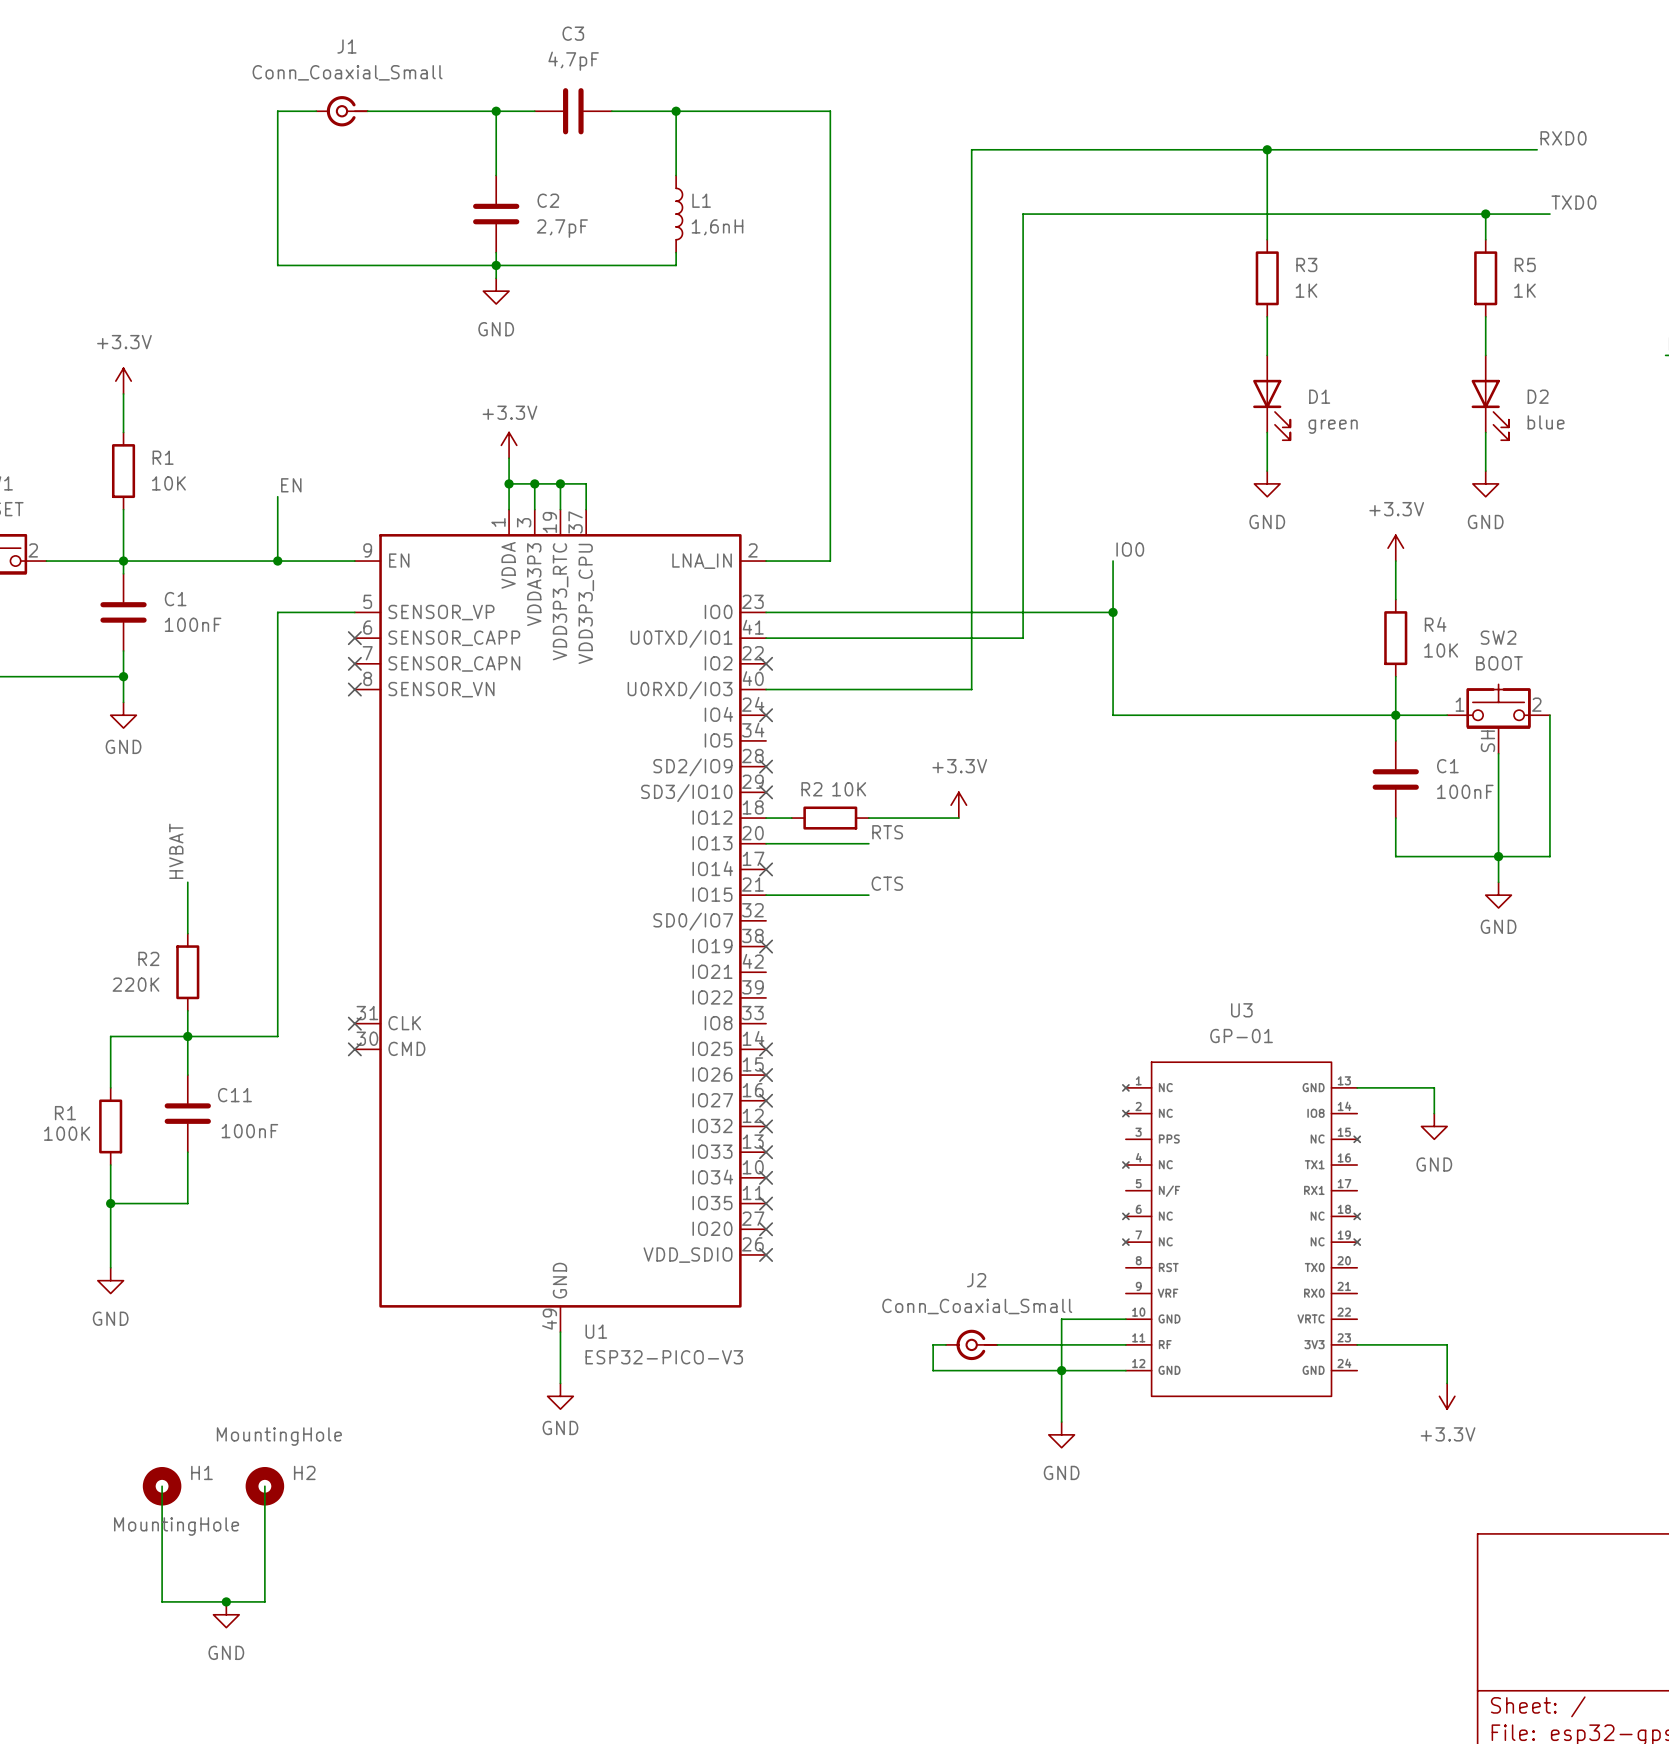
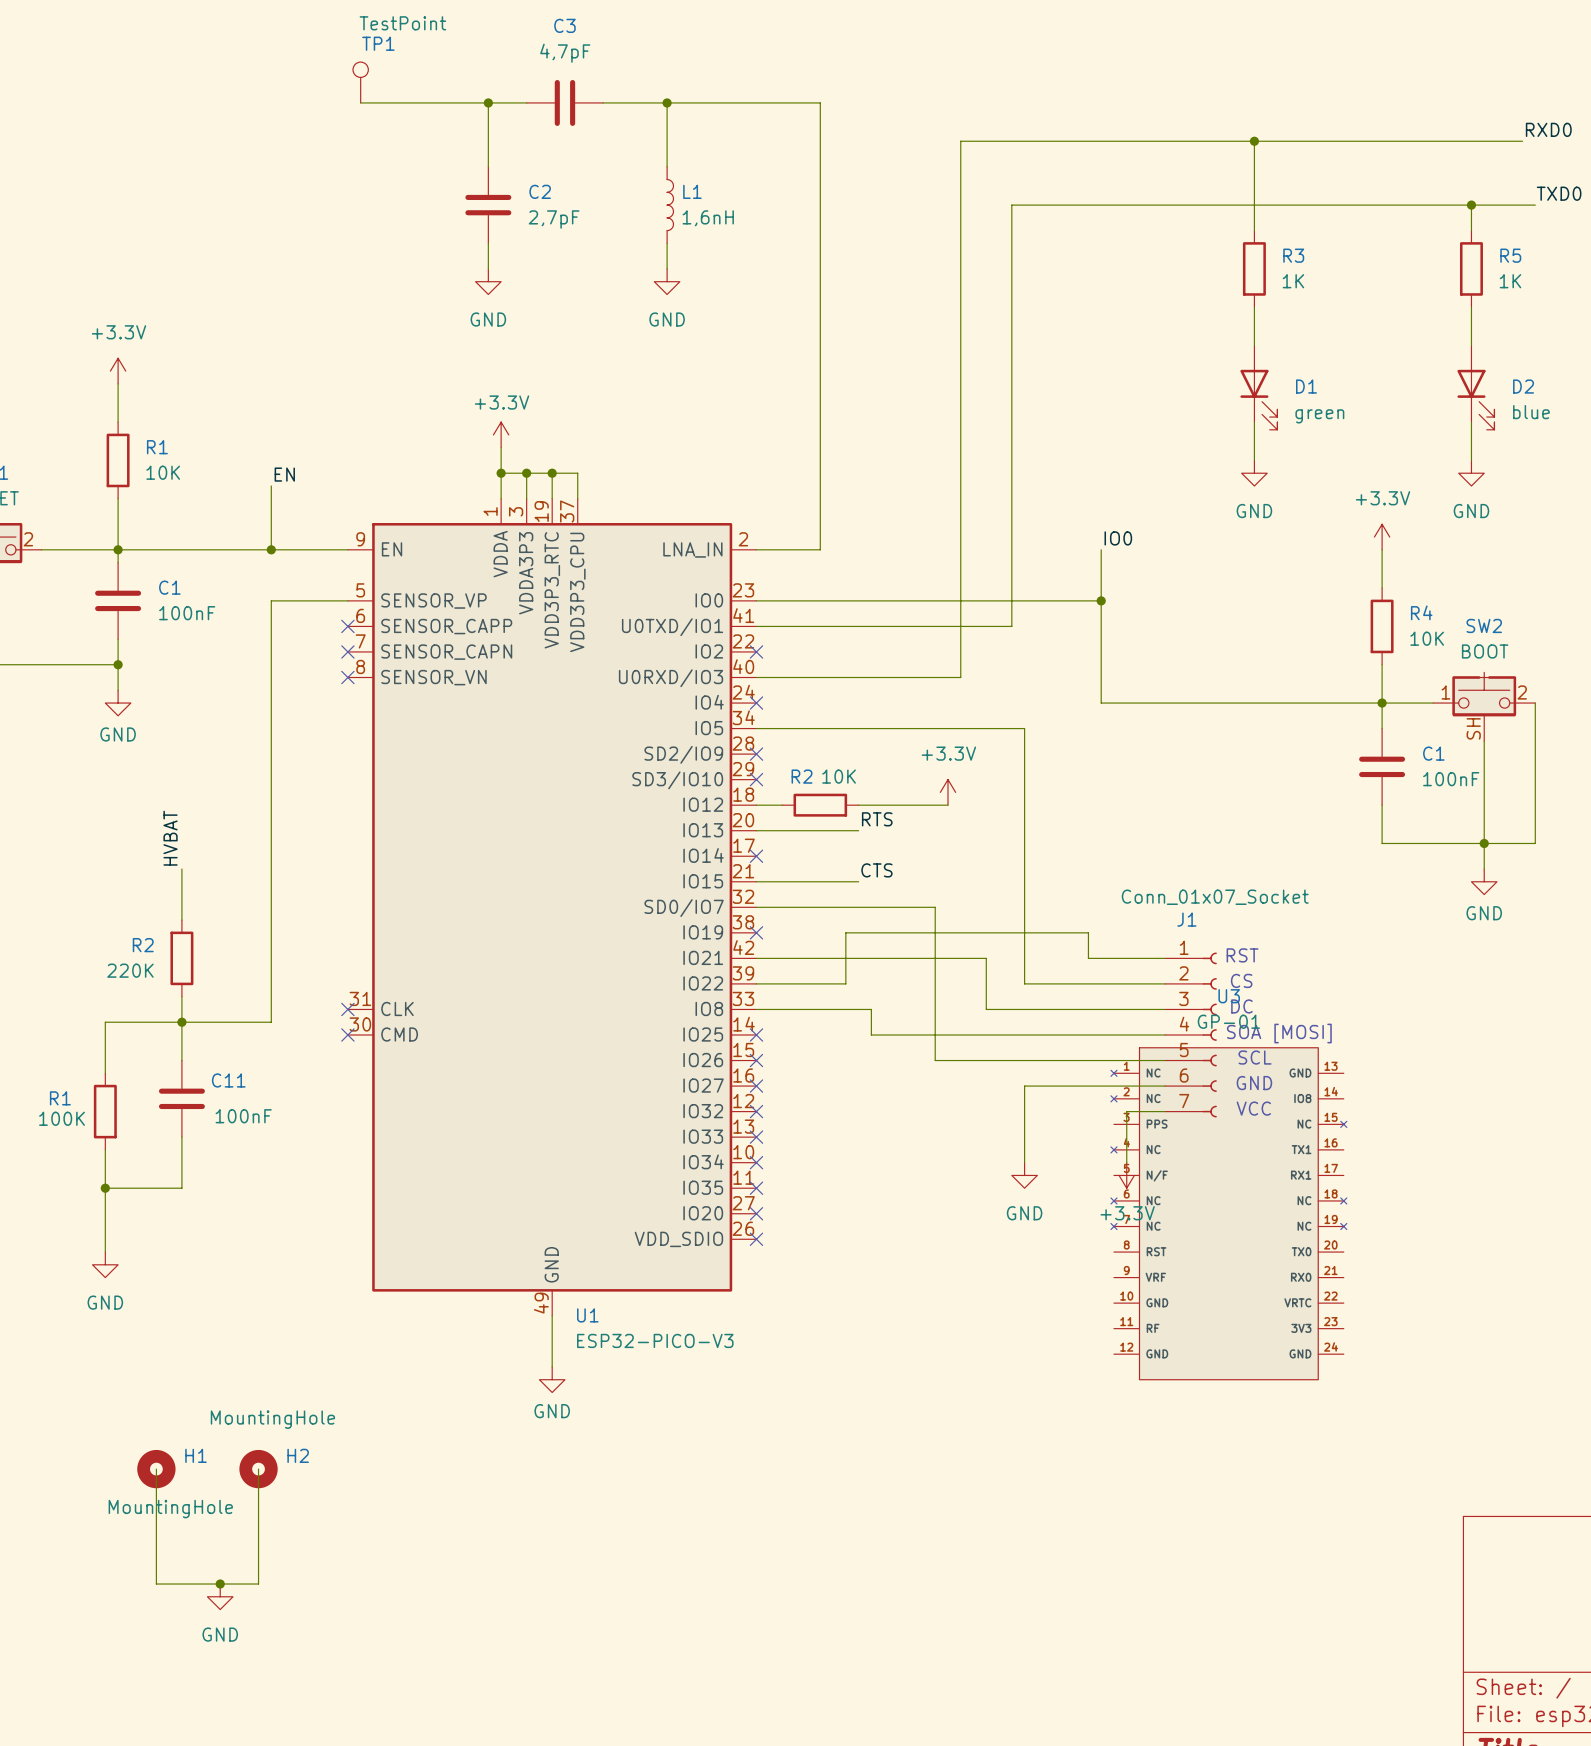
J1 name position: J1 (346, 46) -> J1 (1186, 919)
J1 value: Conn_Coaxial_Small (347, 72) -> Conn_01x07_Socket (1215, 897)
TP1: none -> TestPoint (360, 82)
J1 symbol: [316, 96, 368, 127] -> [1165, 952, 1217, 1118]
wire: (316, 111) (277, 111) (277, 265) (676, 265) -> (667, 268) (667, 256)
junction: (496, 265) -> none
power symbol: none -> GND (667, 281)
wire: none -> (756, 728) (1024, 728) (1024, 983) (1165, 983)
wire: none -> (756, 907) (935, 907) (935, 1060) (1165, 1060)
text: none -> RST (1242, 955)
wire: none -> (756, 958) (986, 958) (986, 1009) (1165, 1009)
wire: none -> (1165, 958) (1088, 958) (1088, 932) (845, 932) (845, 983) (756, 983)
text: none -> CS (1241, 980)
text: none -> DC (1241, 1006)
wire: none -> (756, 1009) (871, 1009) (871, 1034) (1165, 1034)
text: none -> SOA [MOSI] (1279, 1033)
text: none -> SCL (1255, 1057)
wire: (1357, 1087) (1434, 1087) (1434, 1113) -> none
text: none -> GND (1254, 1083)
wire: none -> (1165, 1086) (1024, 1086) (1024, 1162)
text: none -> VCC (1253, 1108)
wire: none -> (1165, 1111) (1126, 1111) (1126, 1162)
power symbol: GND (1434, 1126) -> none
power symbol: none -> GND (1024, 1175)
power symbol: none -> +3.3V (1126, 1175)
wire: (1125, 1319) (1061, 1319) (1061, 1422) -> none
wire: (945, 1344) (933, 1344) (933, 1370) (1125, 1370) -> none
J2: Conn_Coaxial_Small (971, 1344) -> none
wire: (997, 1344) (1125, 1344) -> none
wire: (1357, 1344) (1447, 1344) (1447, 1383) -> none
junction: (1061, 1370) -> none
power symbol: +3.3V (1447, 1396) -> none
power symbol: GND (1061, 1434) -> none

